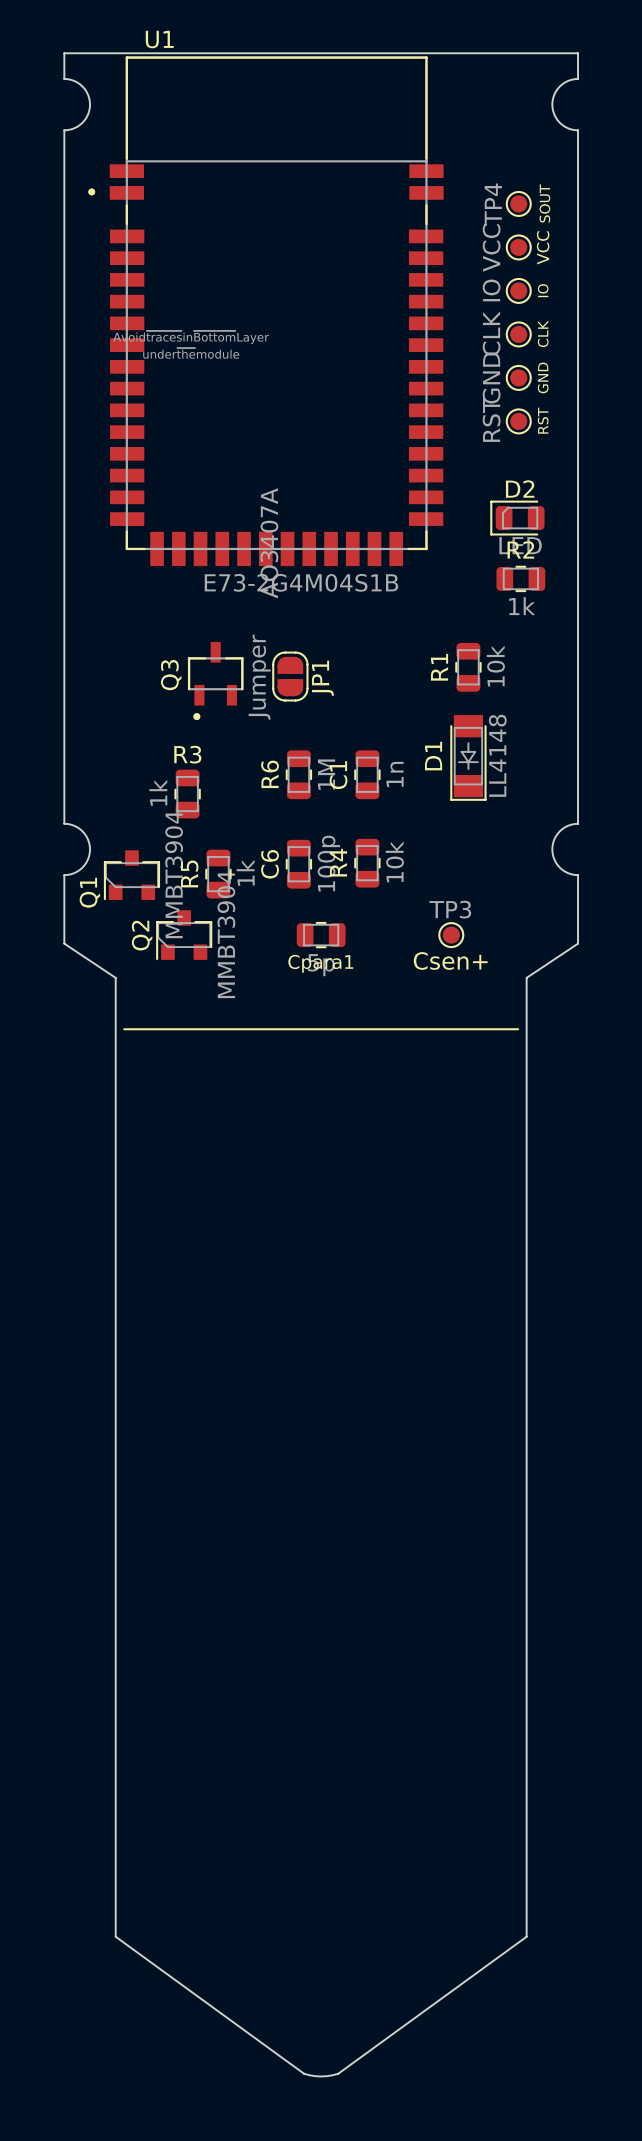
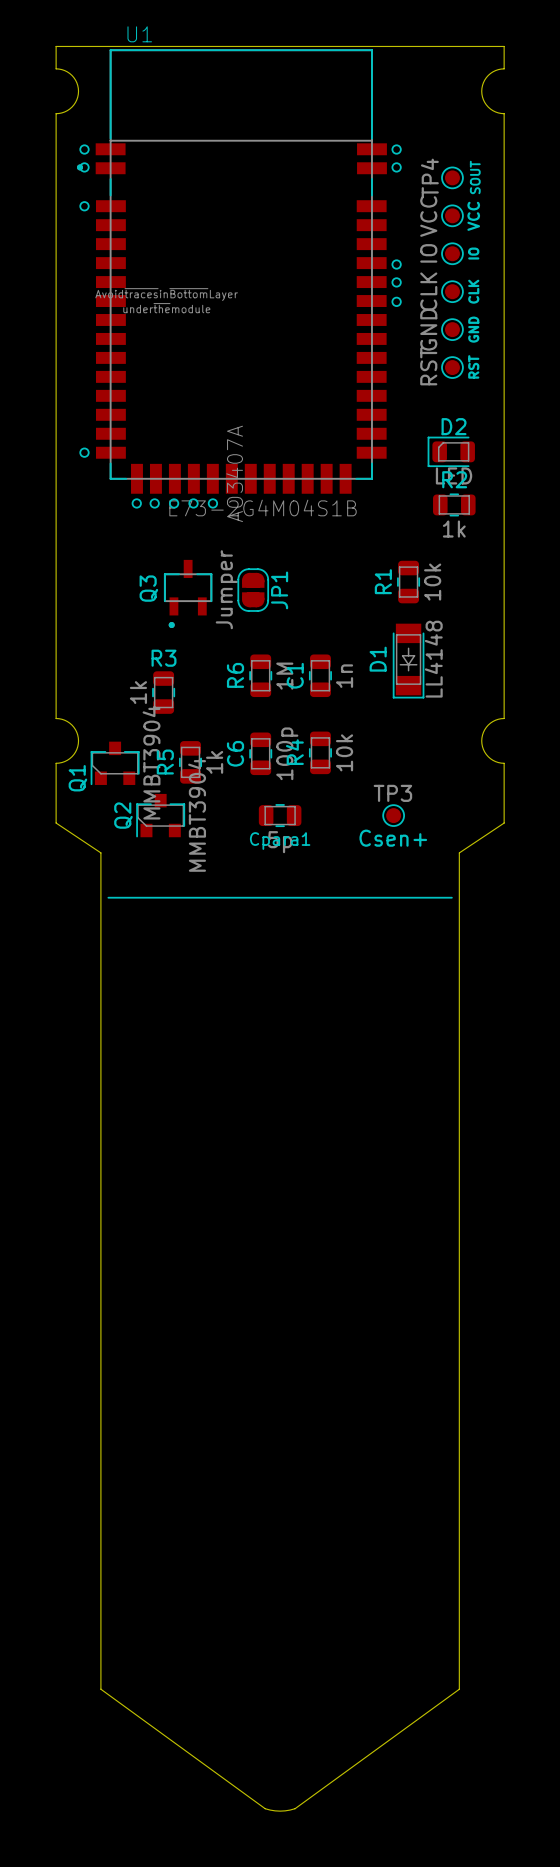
drawing: none -> [79, 144, 90, 173]
drawing: none -> [391, 144, 402, 173]
drawing: none -> [79, 201, 90, 212]
drawing: none -> [391, 259, 402, 307]
drawing: none -> [79, 447, 90, 458]
drawing: none -> [131, 498, 219, 509]

